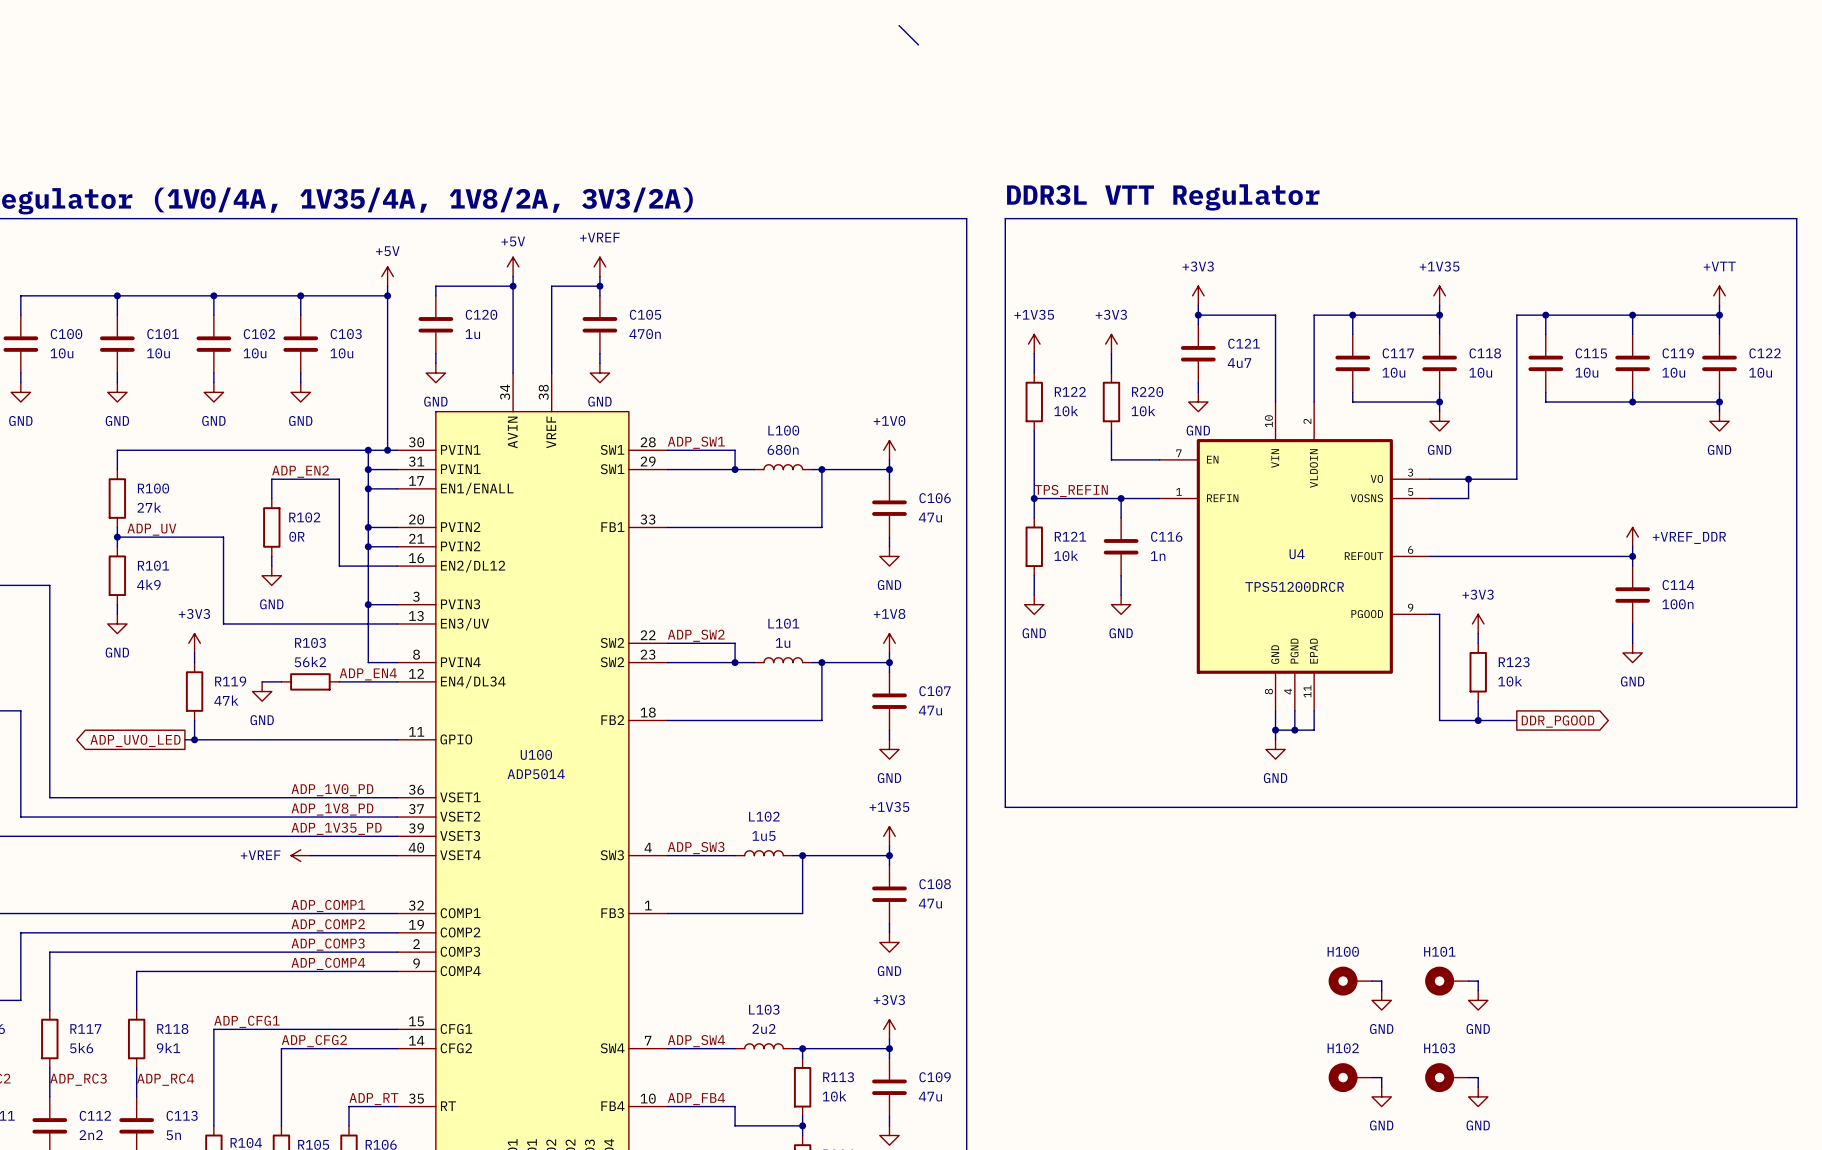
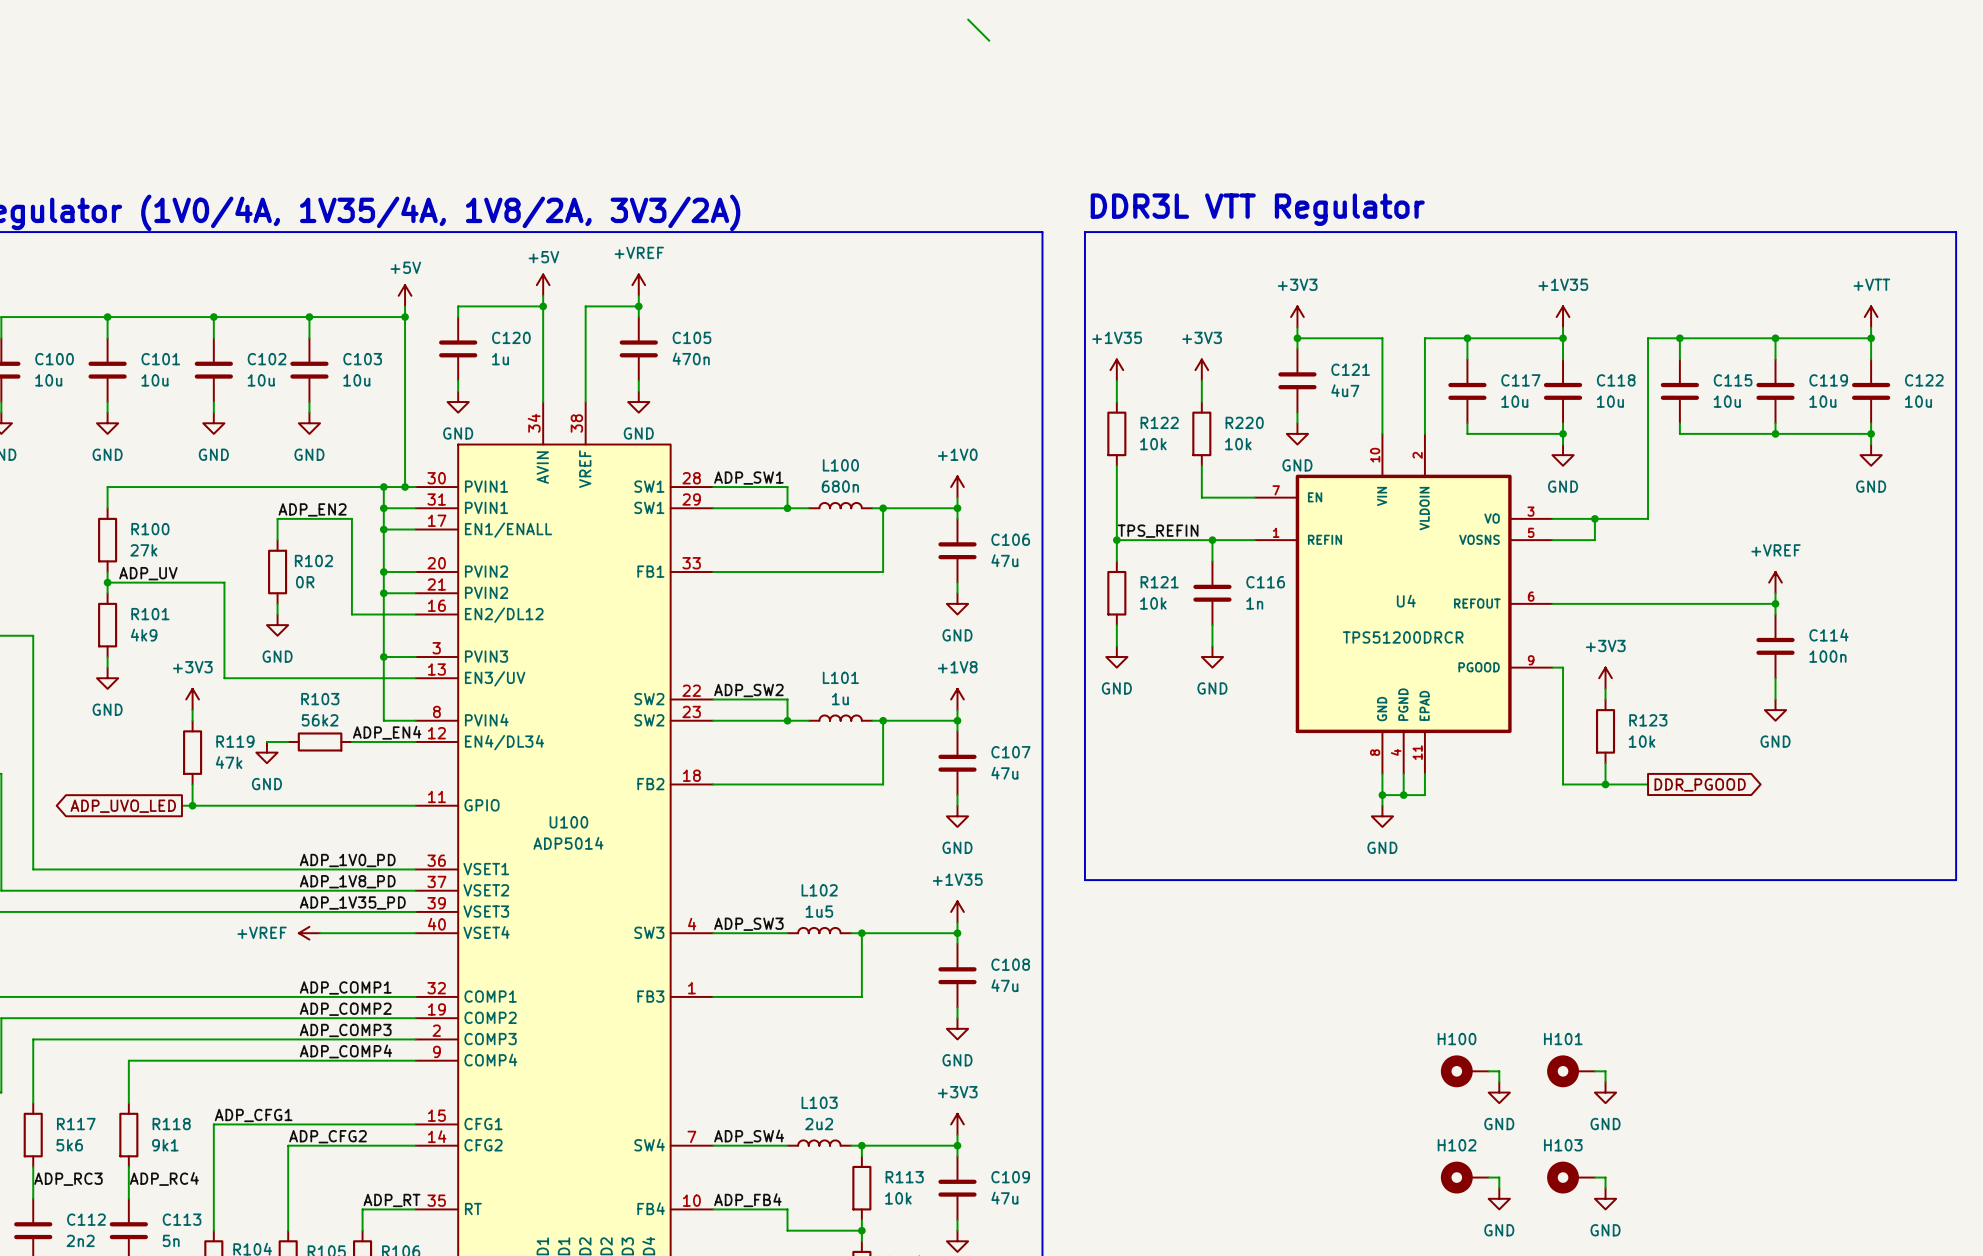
power symbol: +VREF_DDR (1632, 537) -> +VREF (1775, 582)

